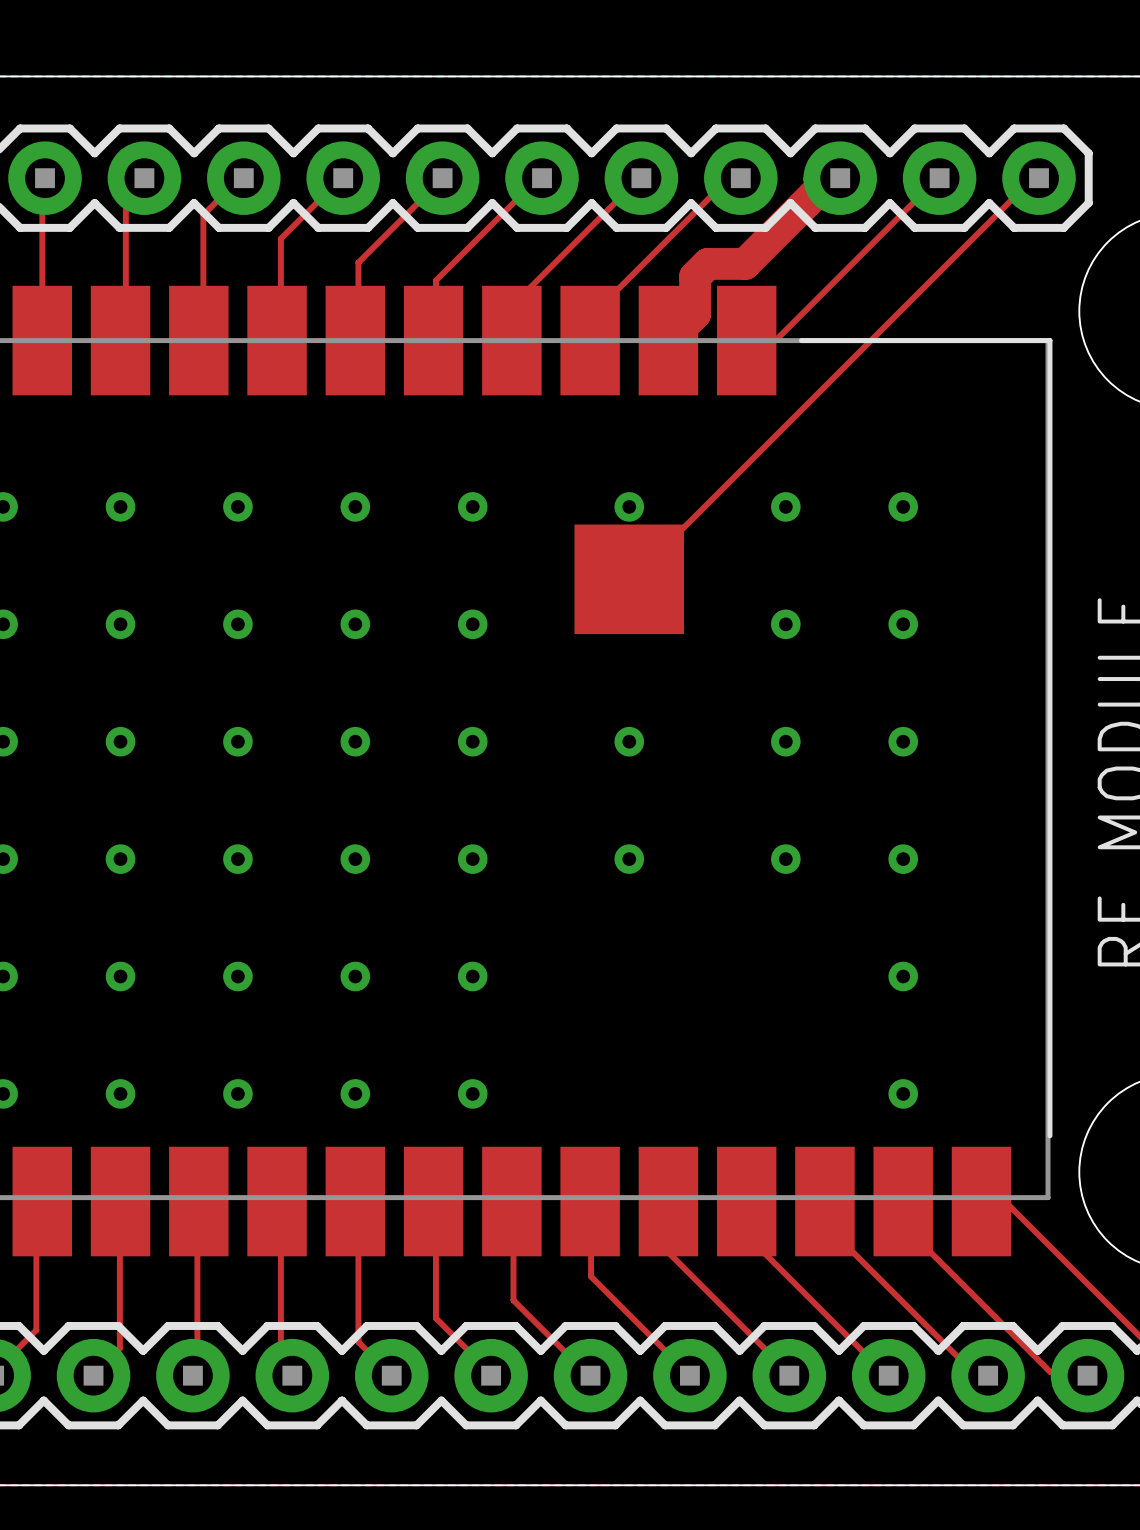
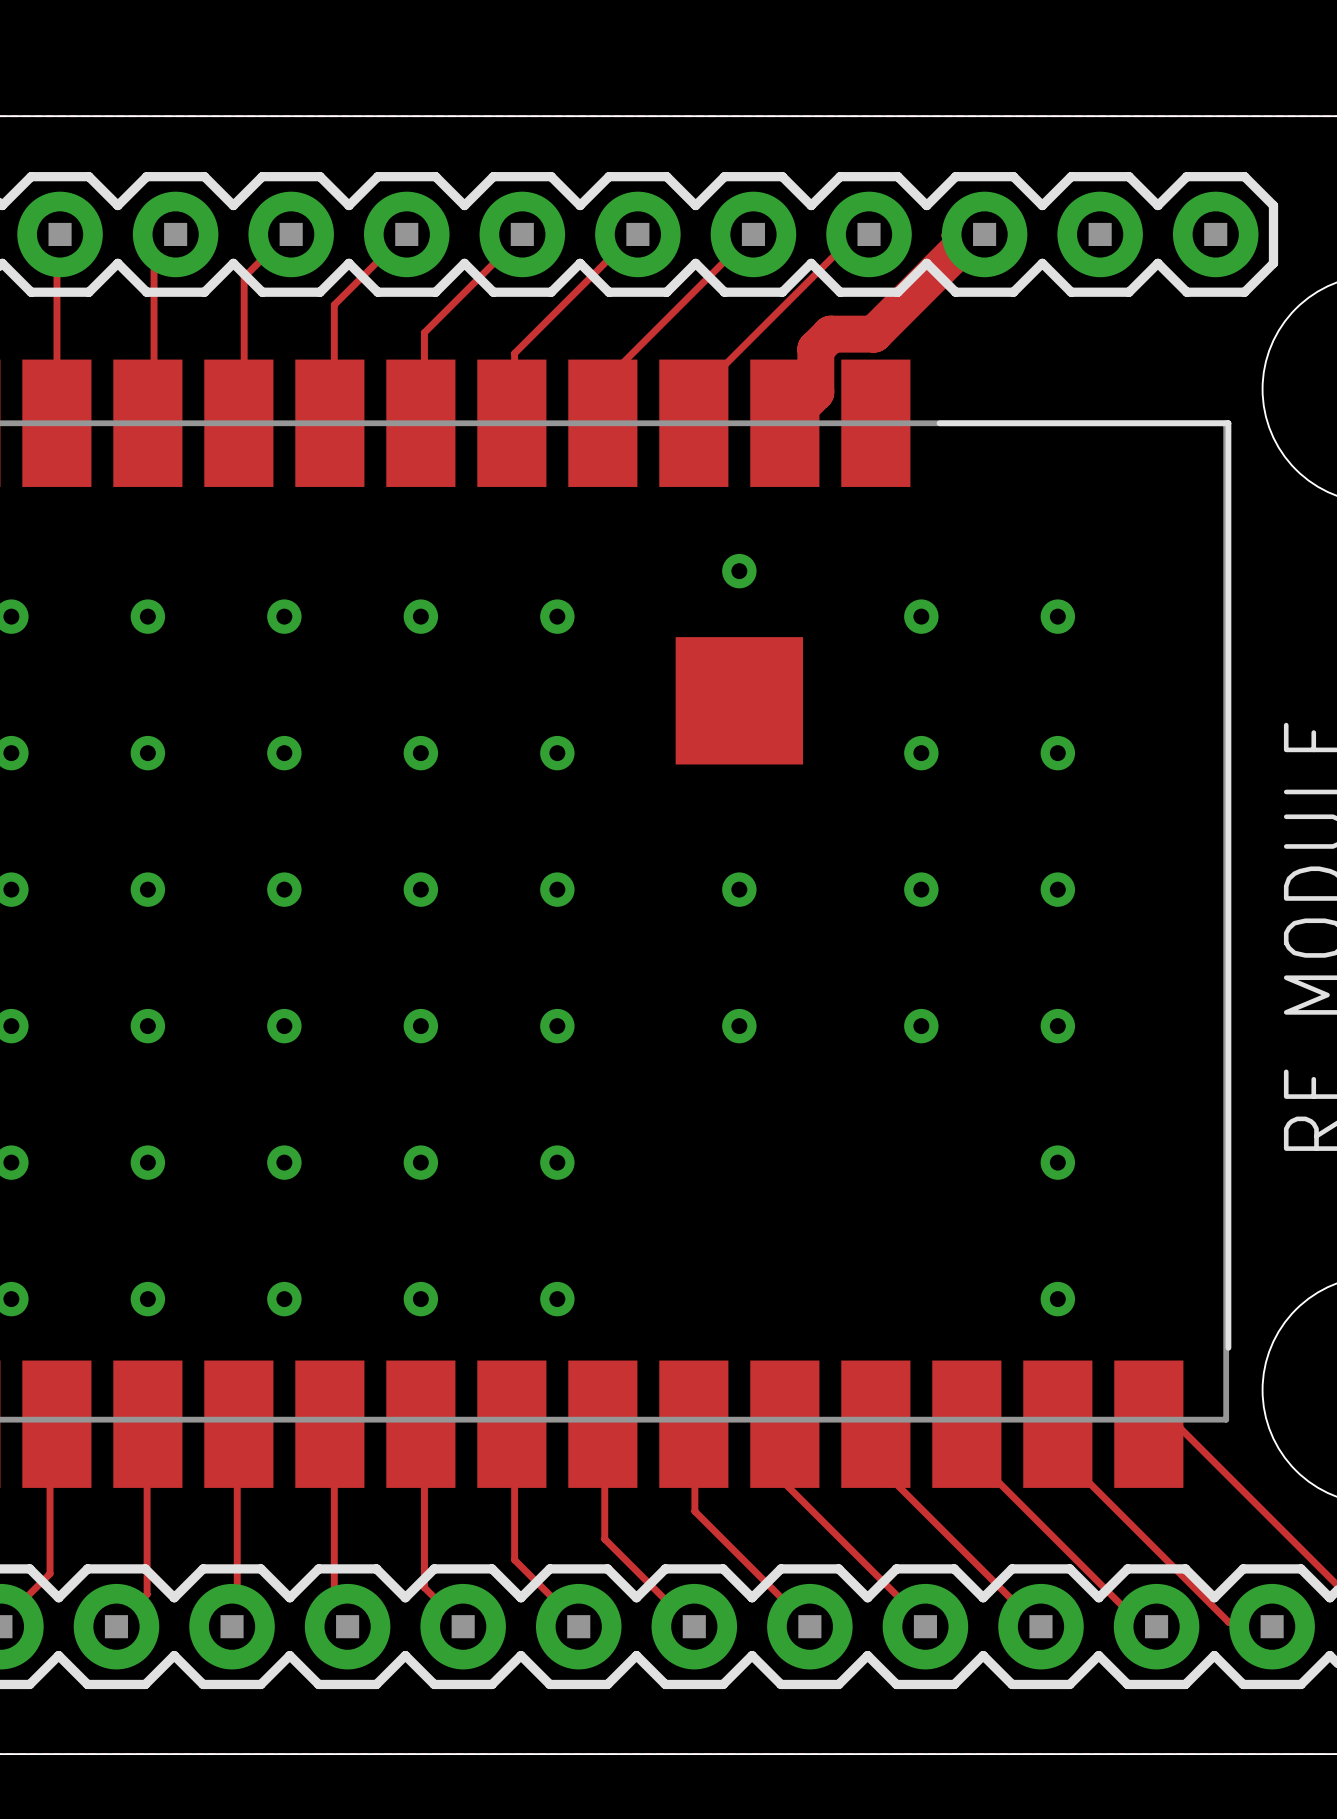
top track: (1038, 173) (632, 578) -> none
top track: (939, 178) (775, 340) (756, 340) -> none
via position: (629, 506) -> (739, 571)

